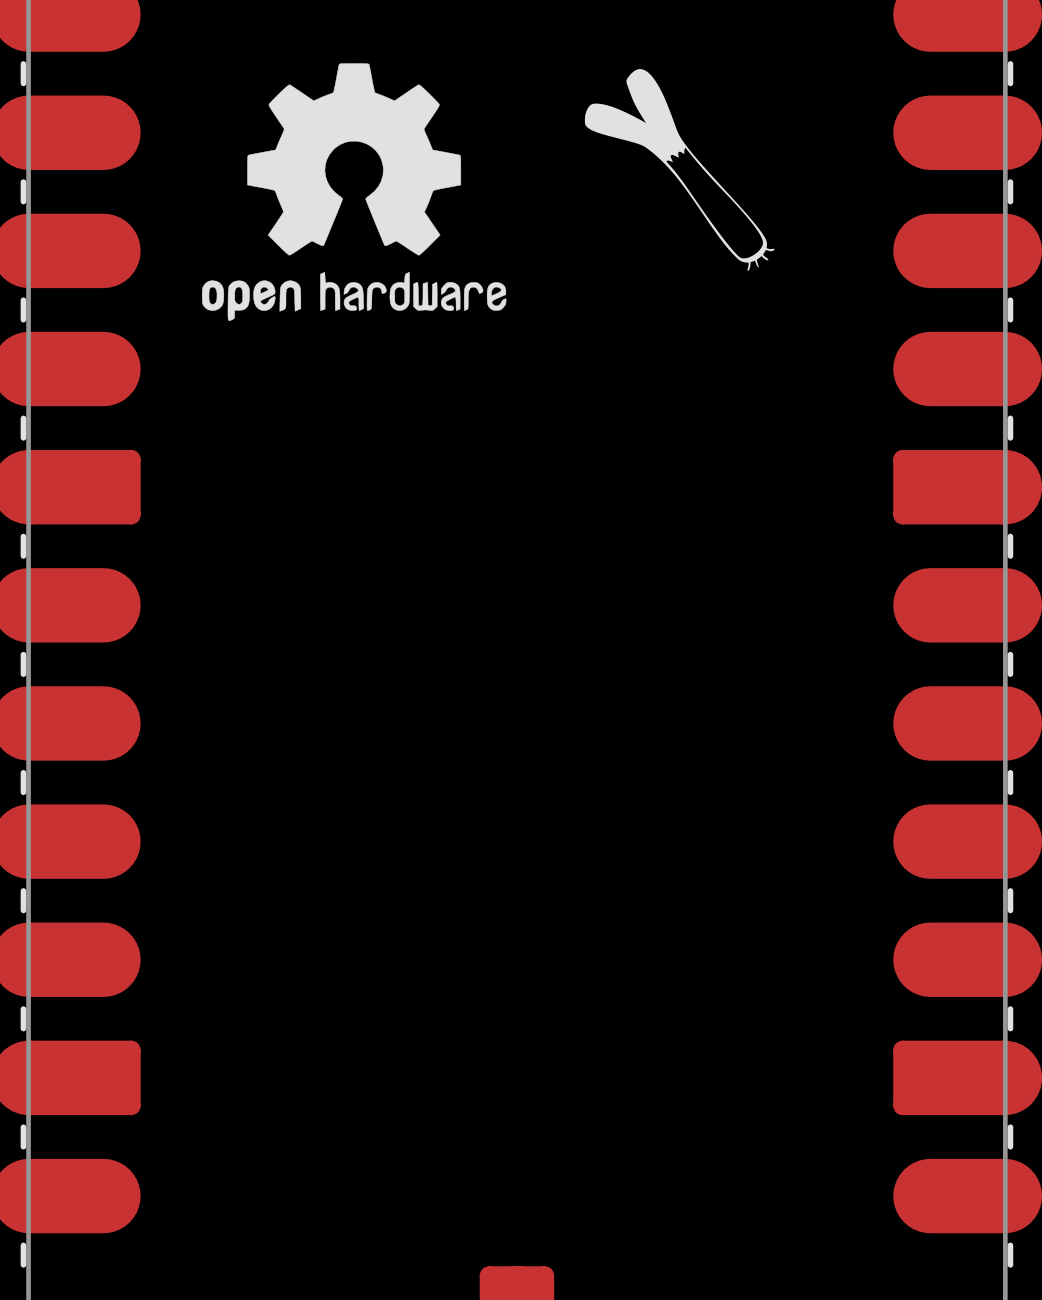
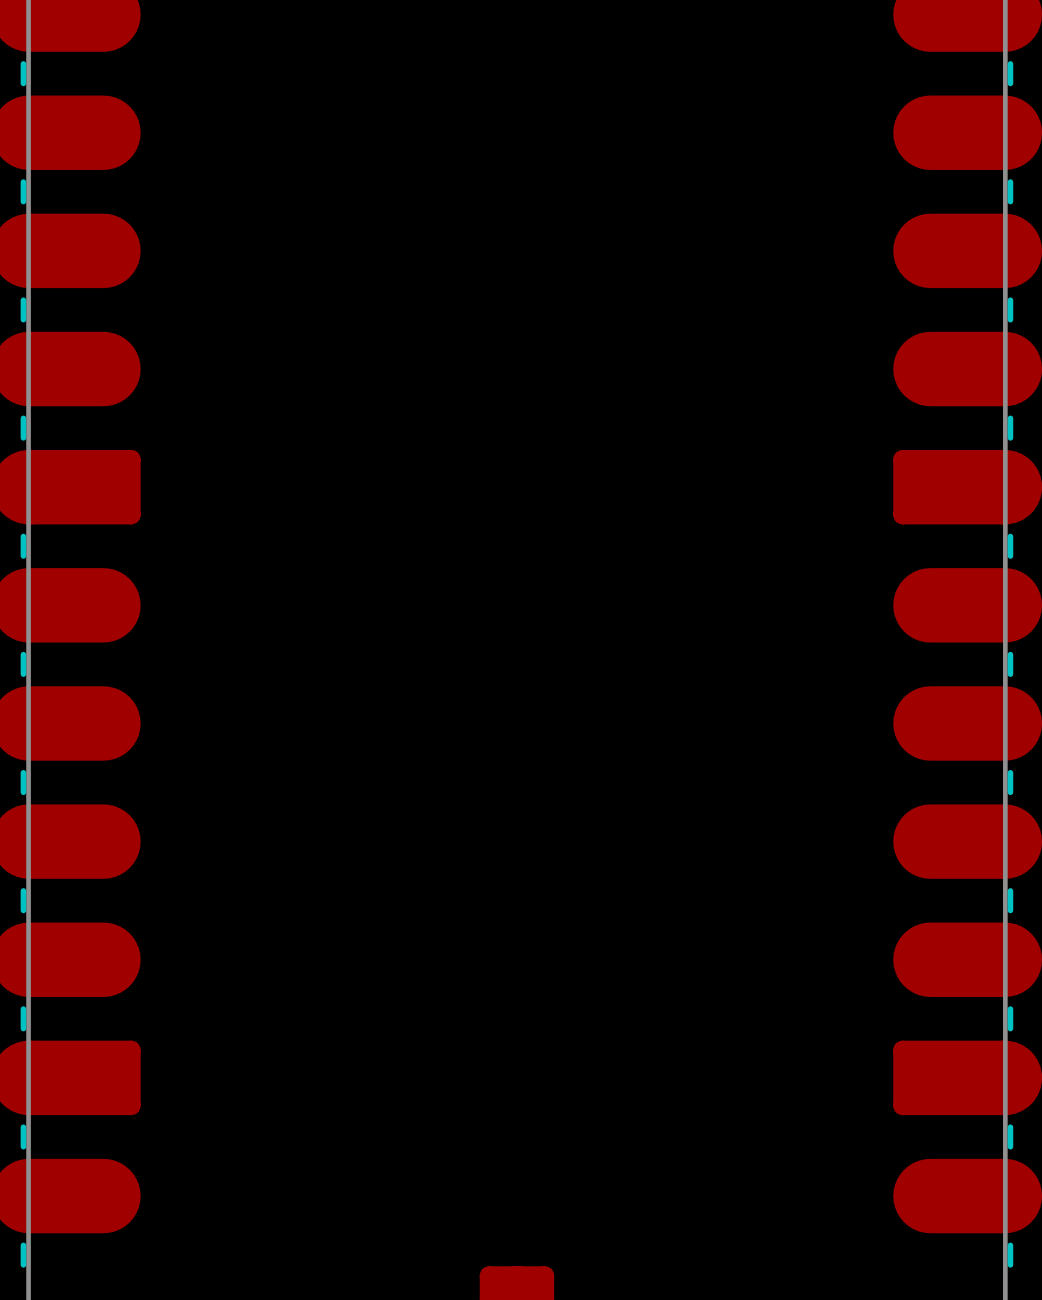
drawing: [202, 63, 507, 321] -> none
drawing: [584, 69, 775, 271] -> none

